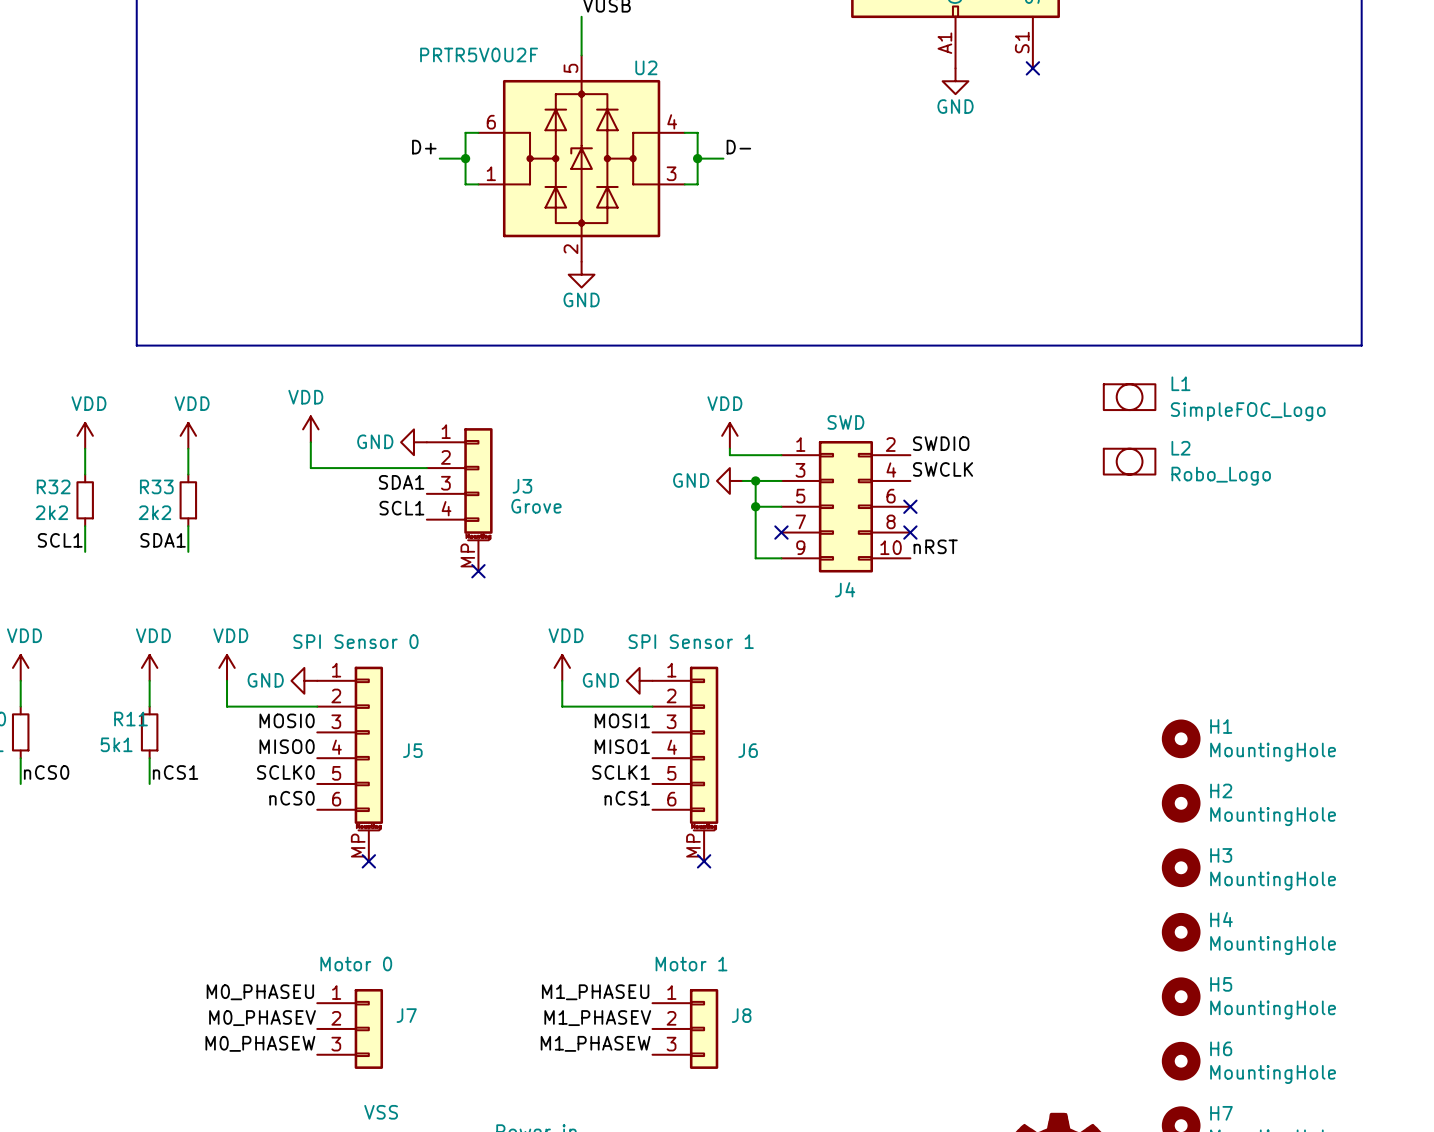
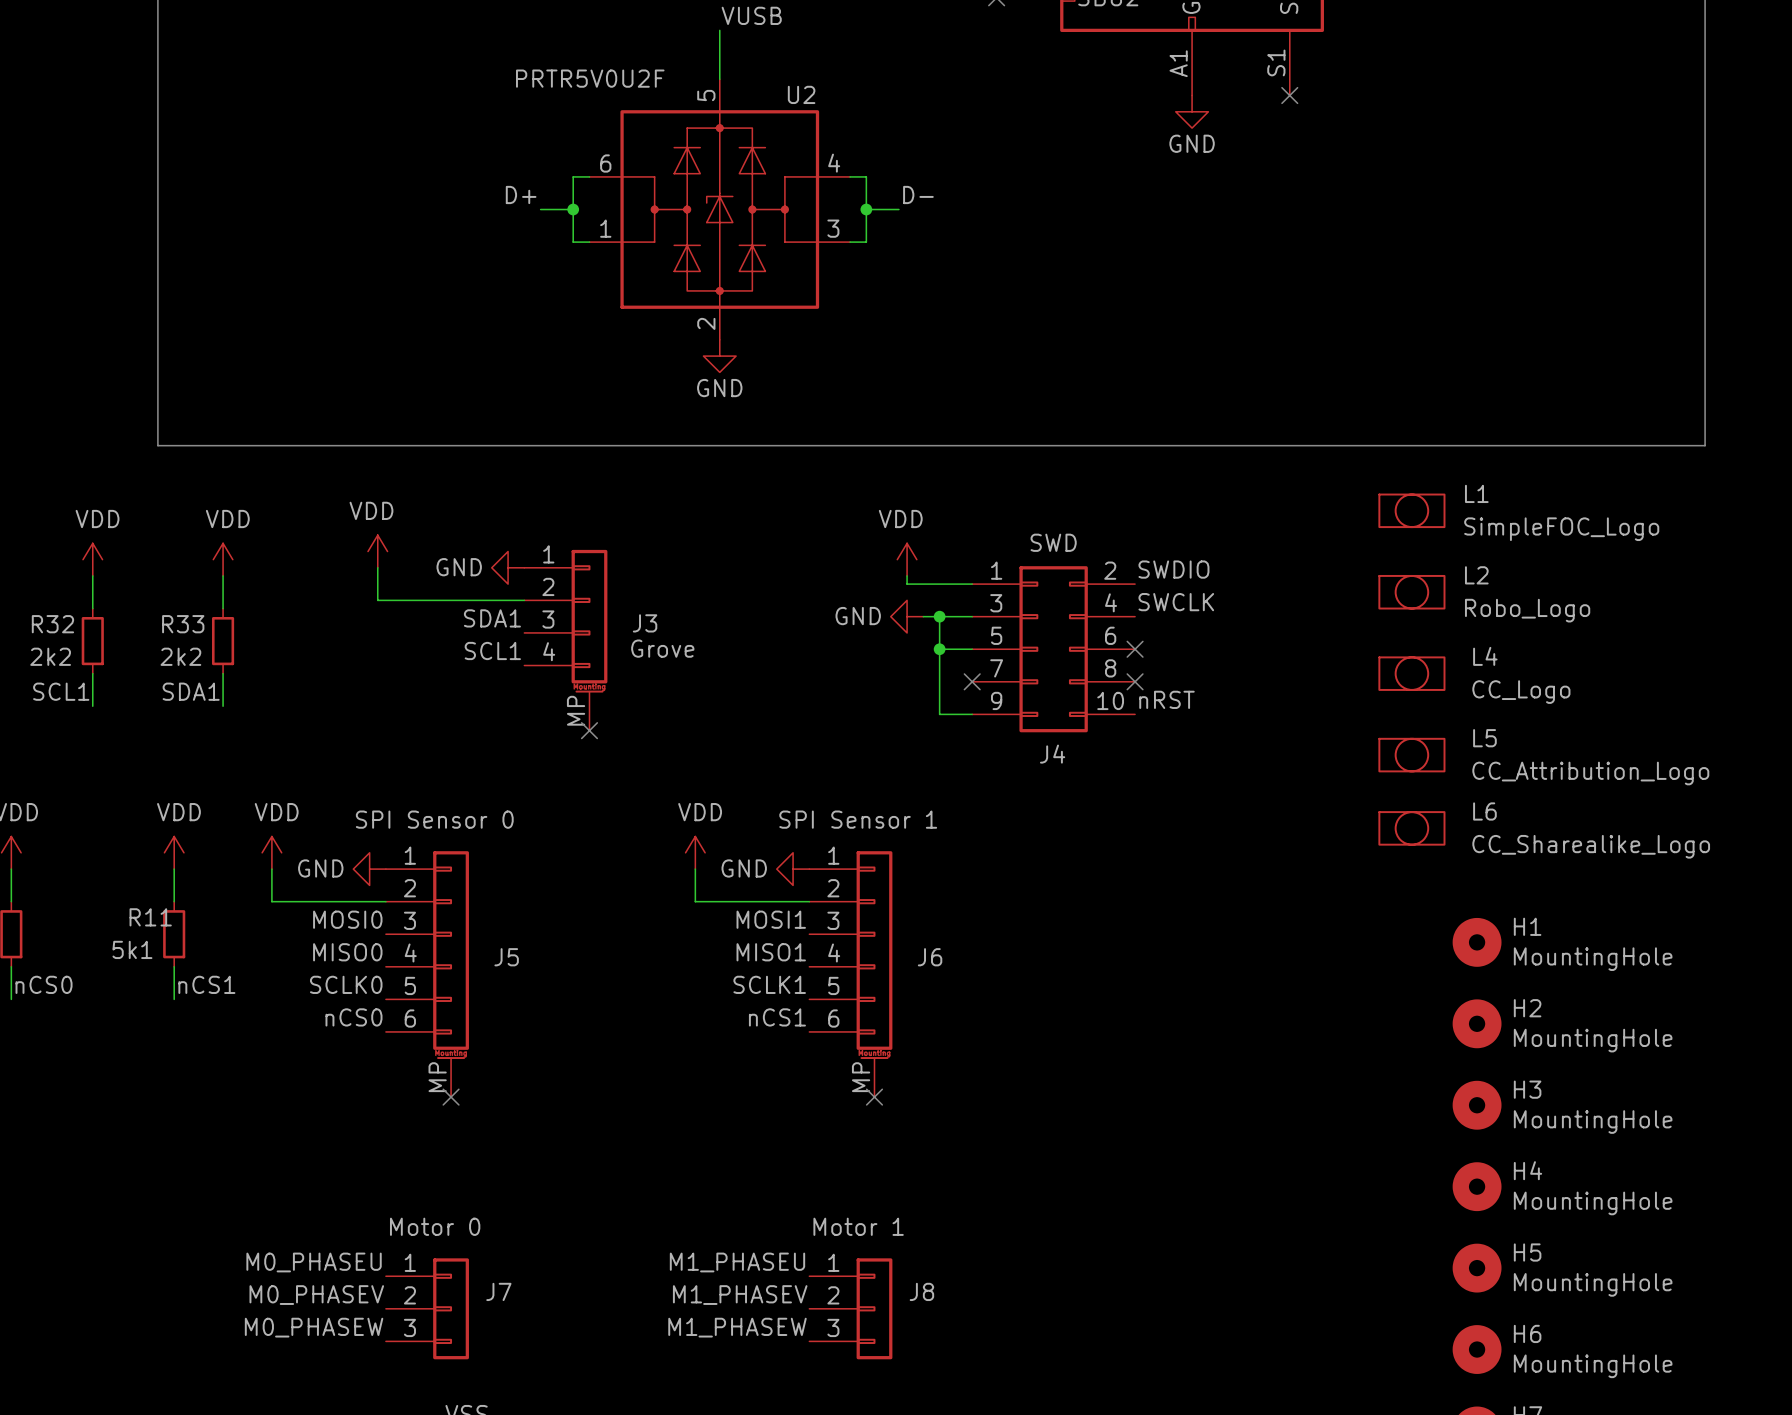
L4: none -> CC_Logo (1411, 673)
L5: none -> CC_Attribution_Logo (1411, 755)
L6: none -> CC_Sharealike_Logo (1411, 828)

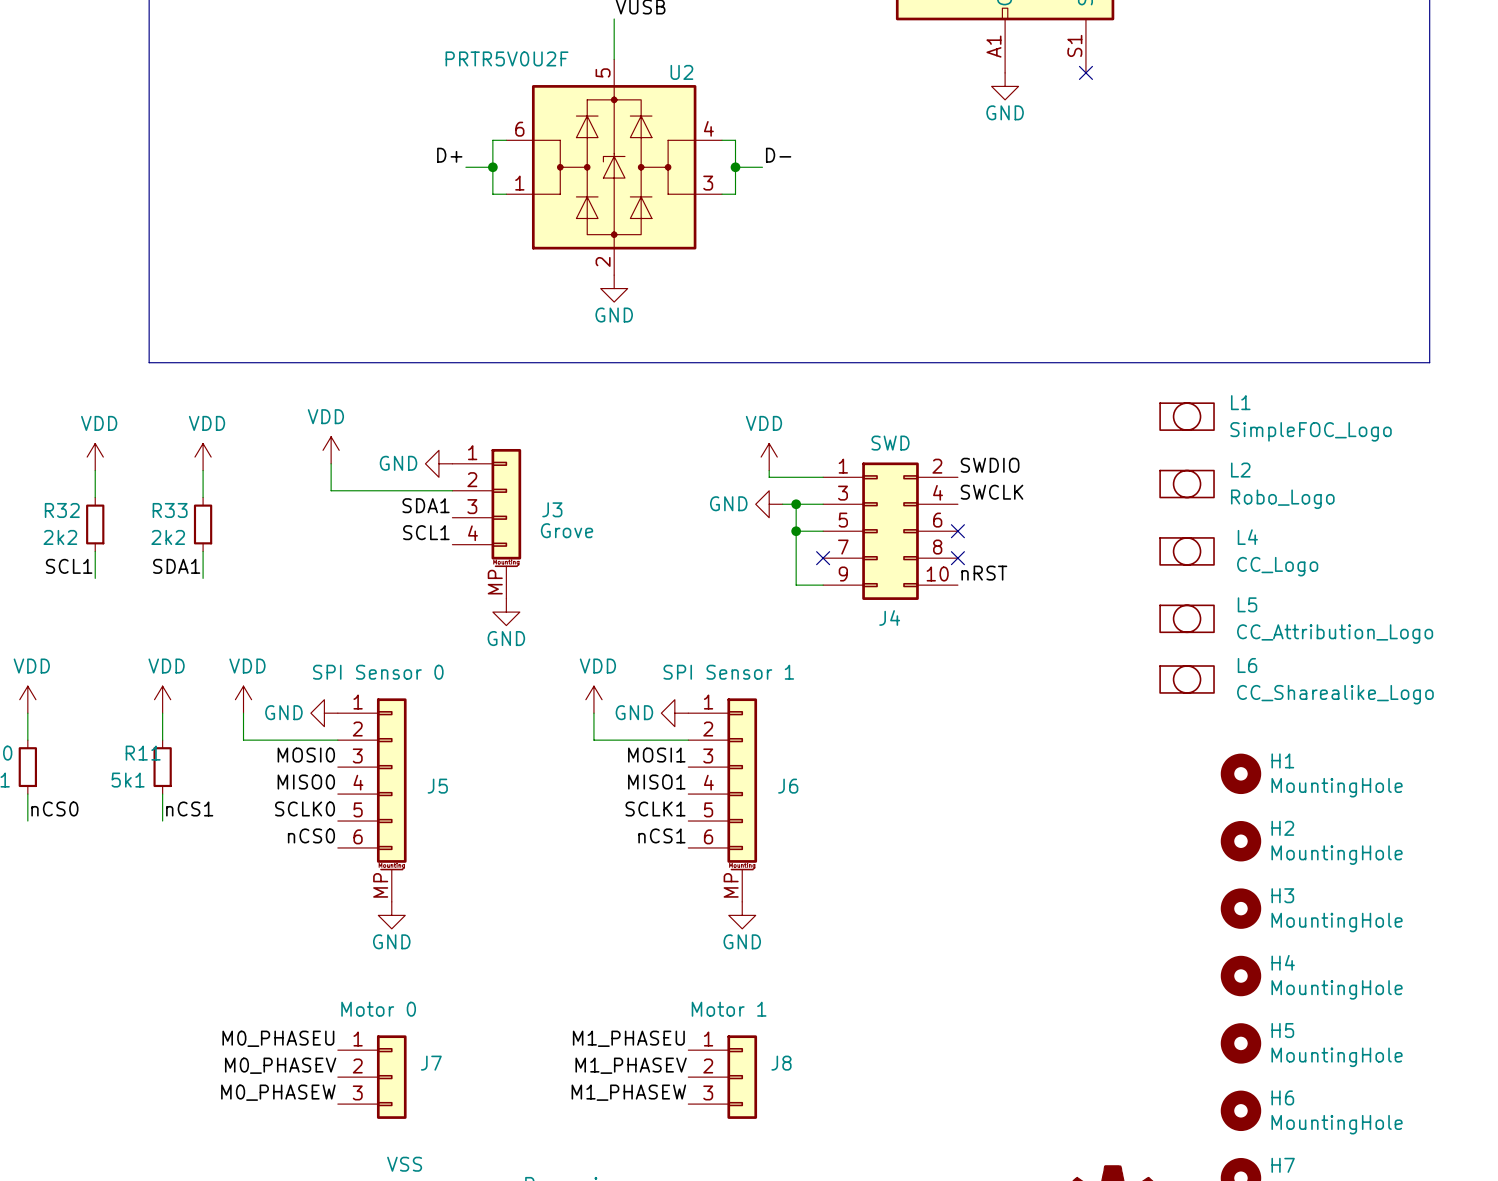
no-connect mark: (589, 730) -> none
power symbol: none -> GND (506, 612)
no-connect mark: (451, 1097) -> none
no-connect mark: (874, 1097) -> none
power symbol: none -> GND (391, 915)
power symbol: none -> GND (742, 915)

